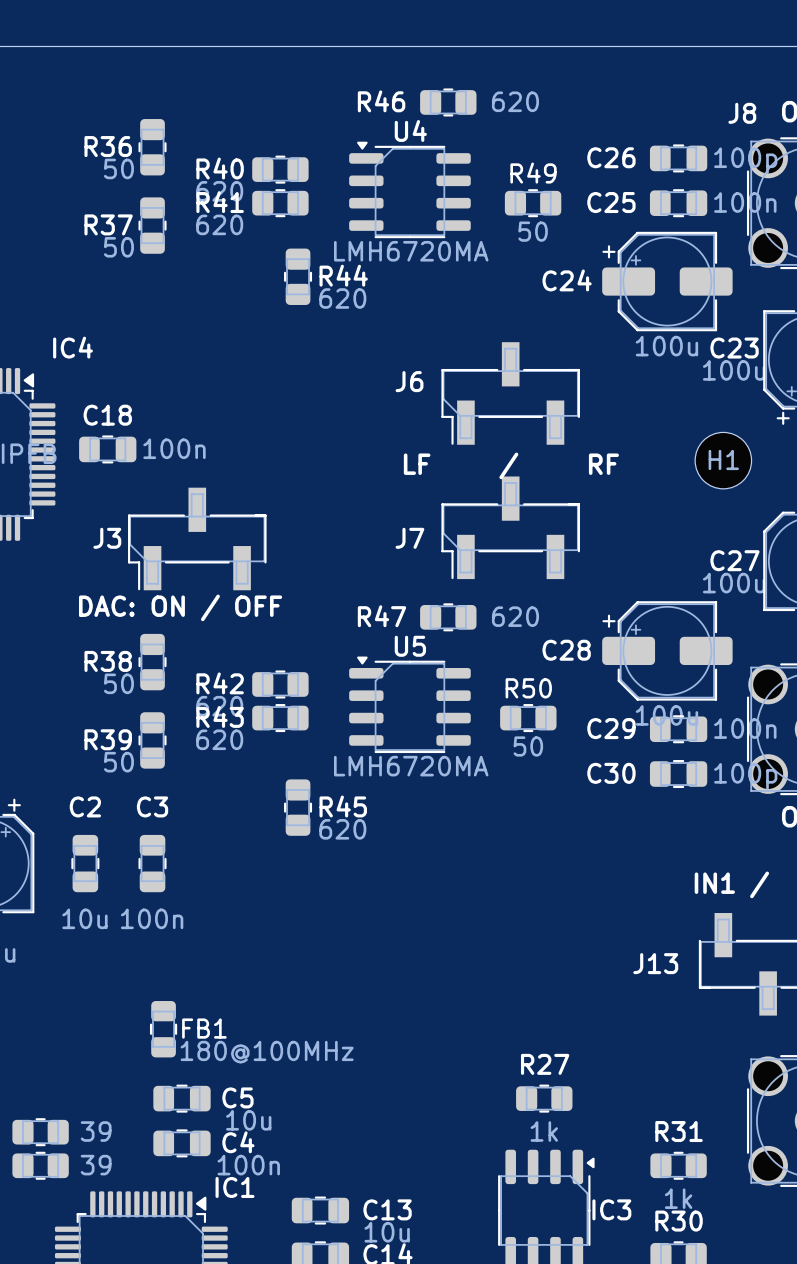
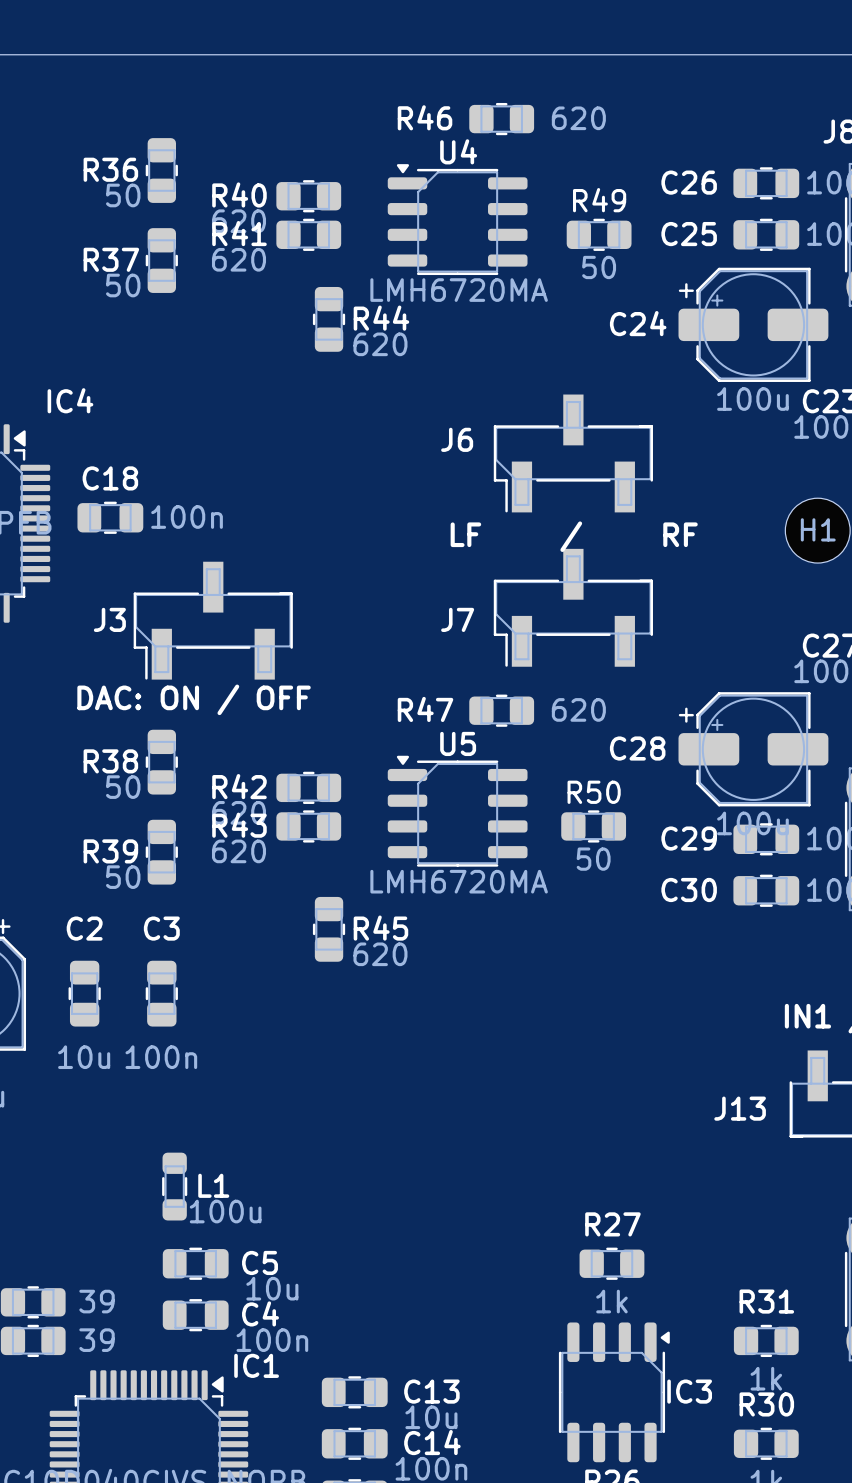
FB1: 180@100MHz (163, 1029) -> none
L1: none -> 100u (174, 1186)

